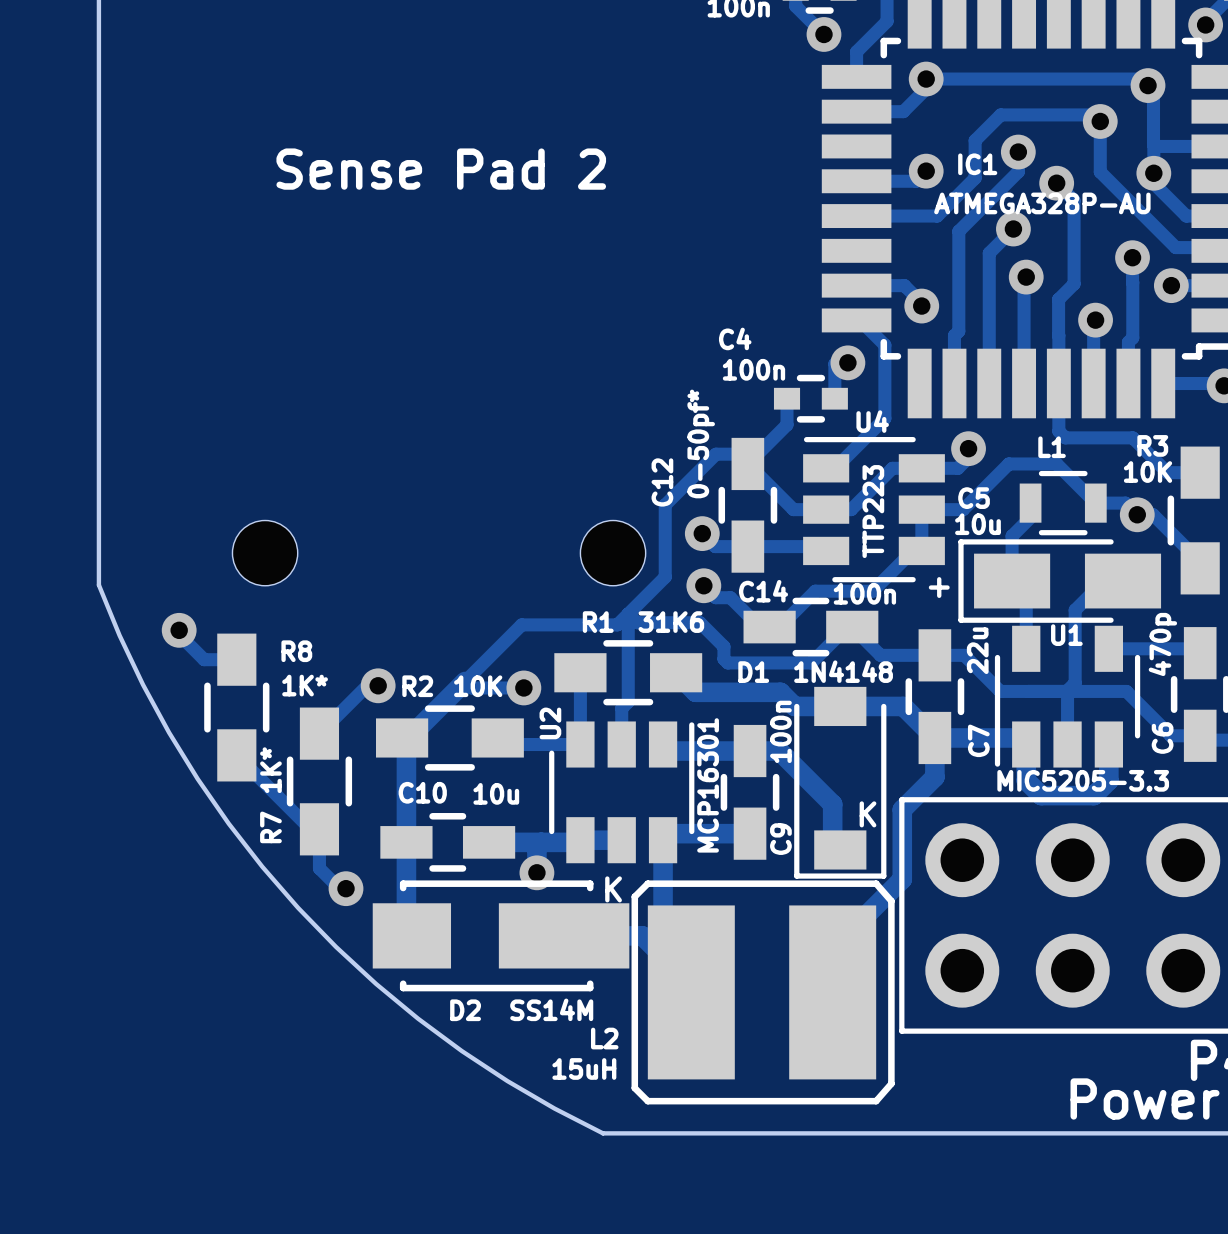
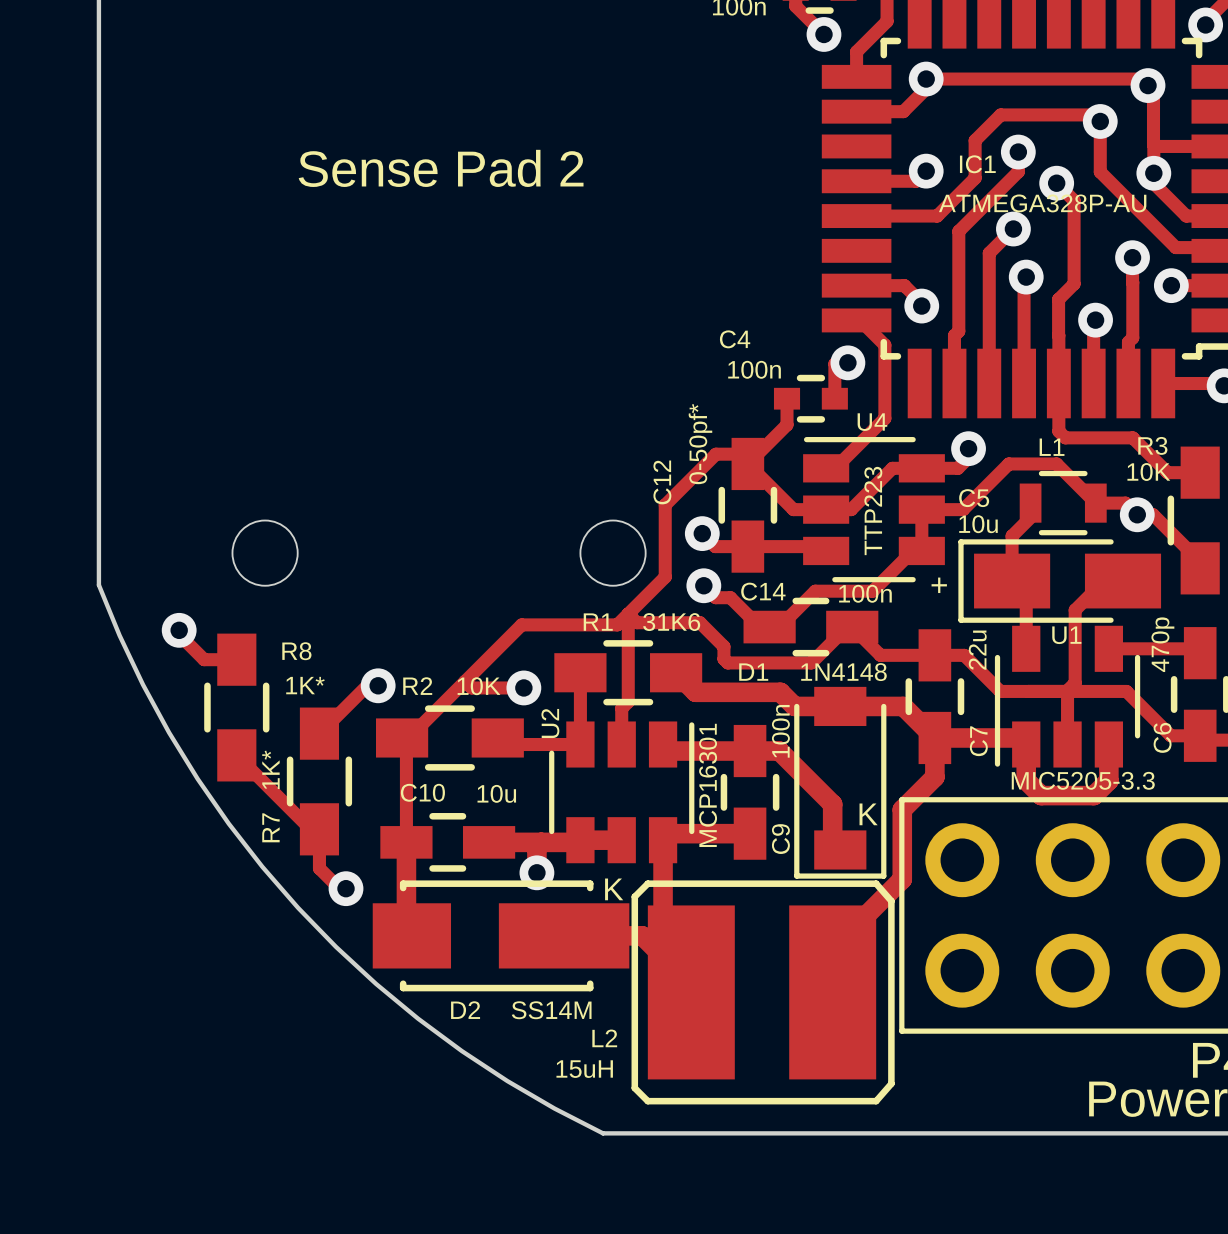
track width: thick (465, 681) (408, 737) -> thin (465, 681) (408, 737)
track width: thick (406, 742) (406, 842) -> thin (406, 742) (406, 842)

